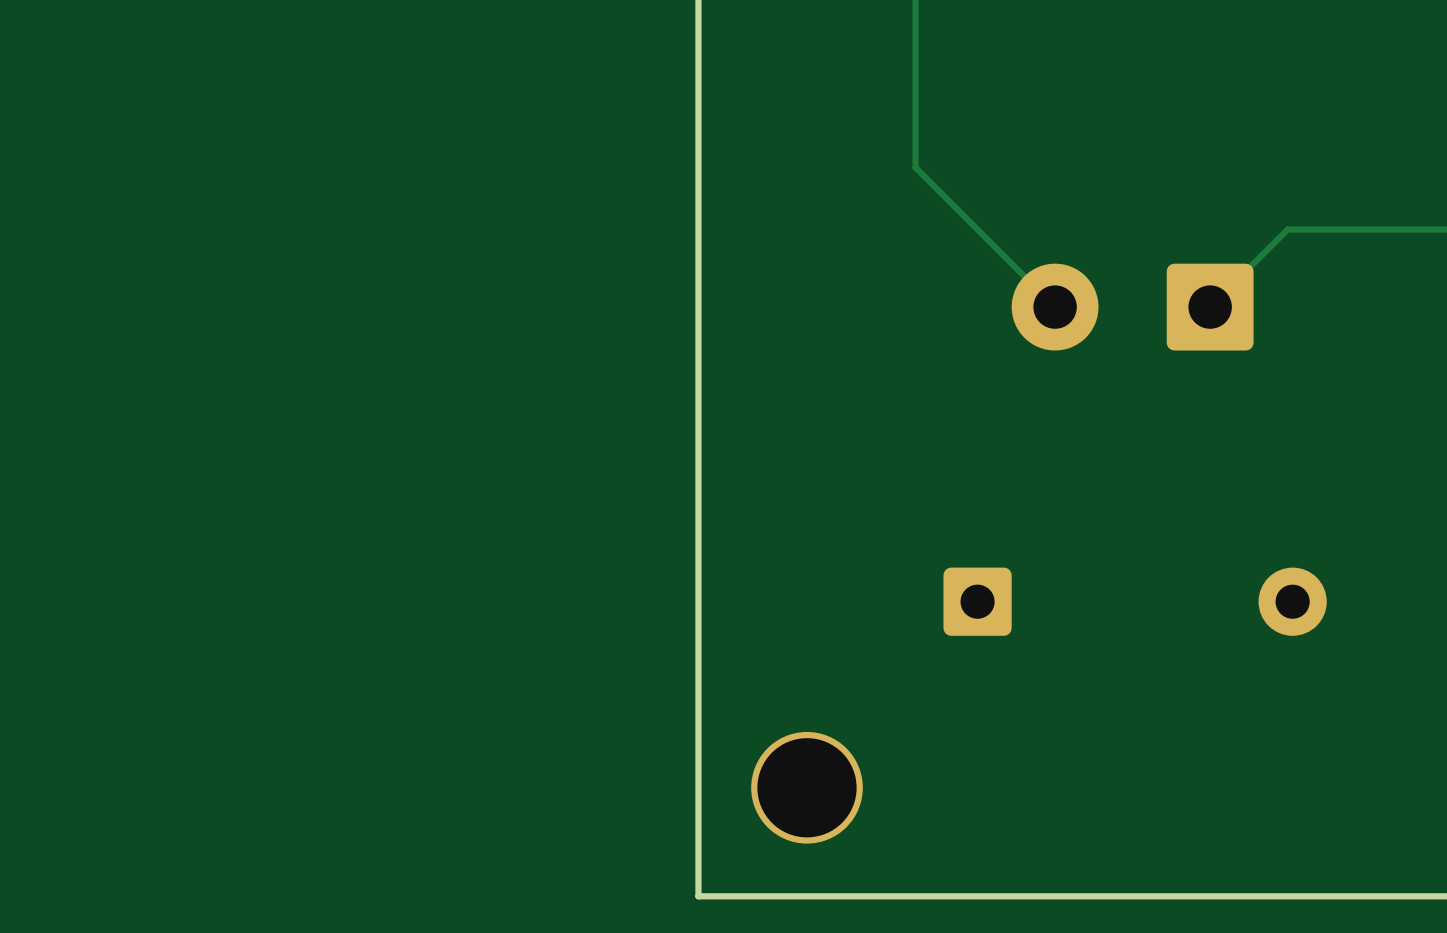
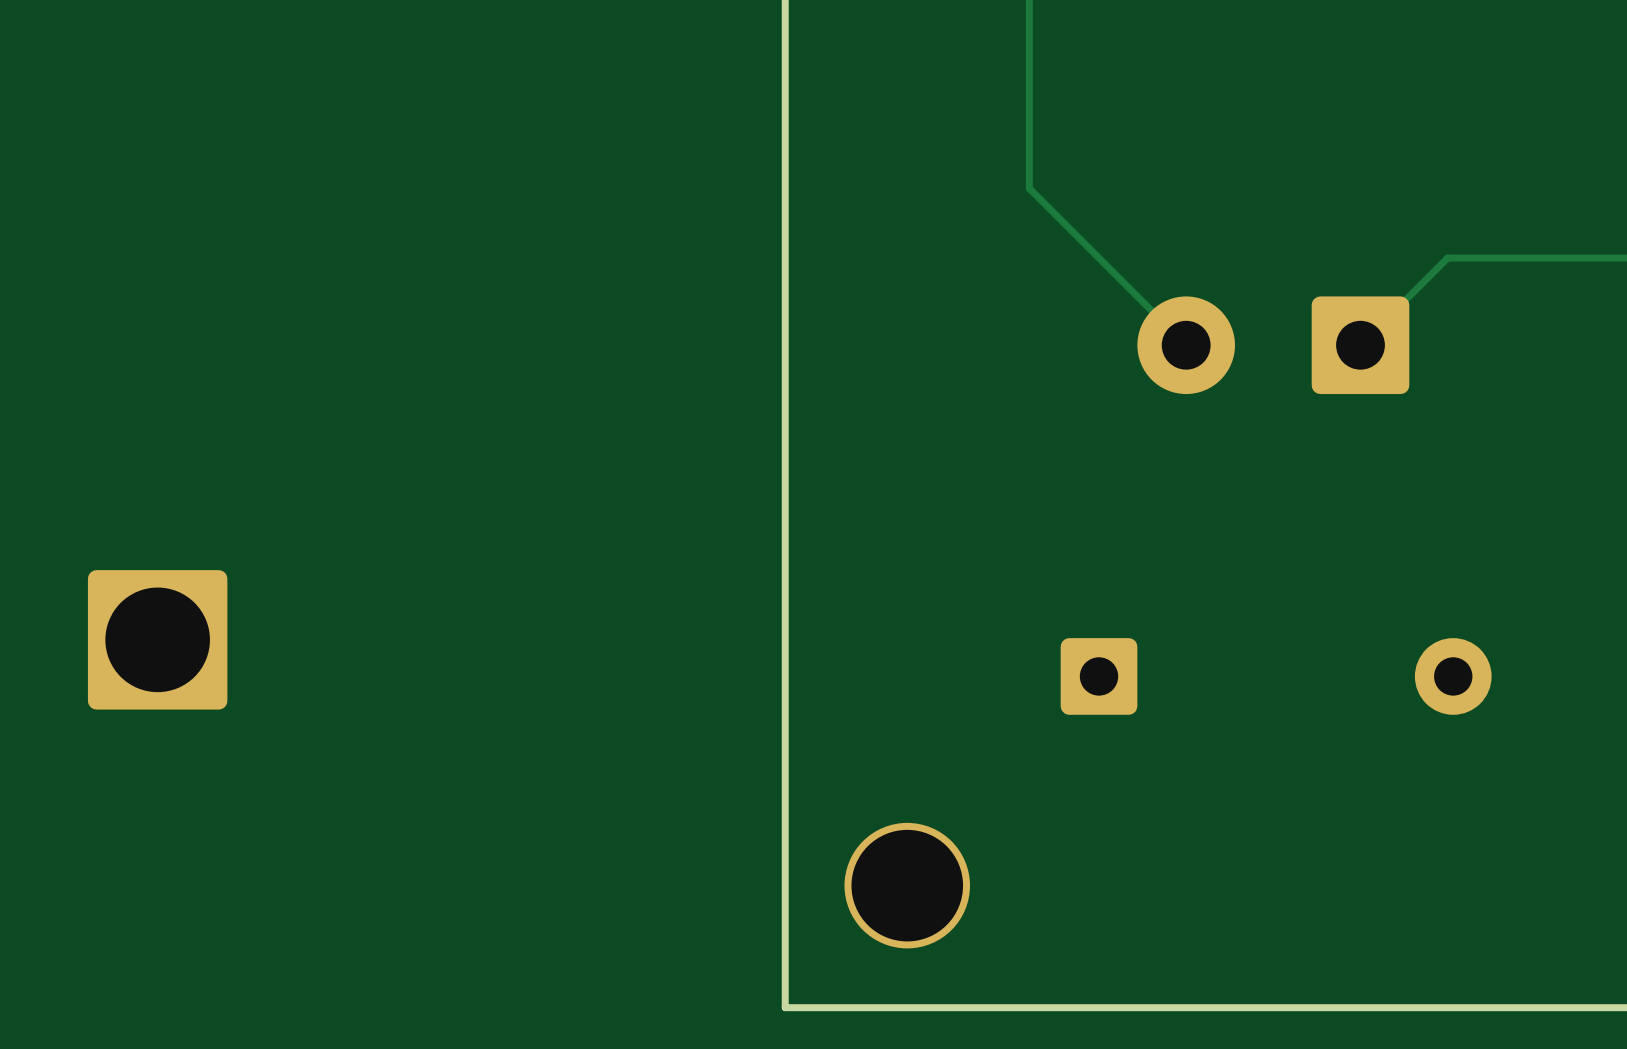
part: none -> (157, 639)

